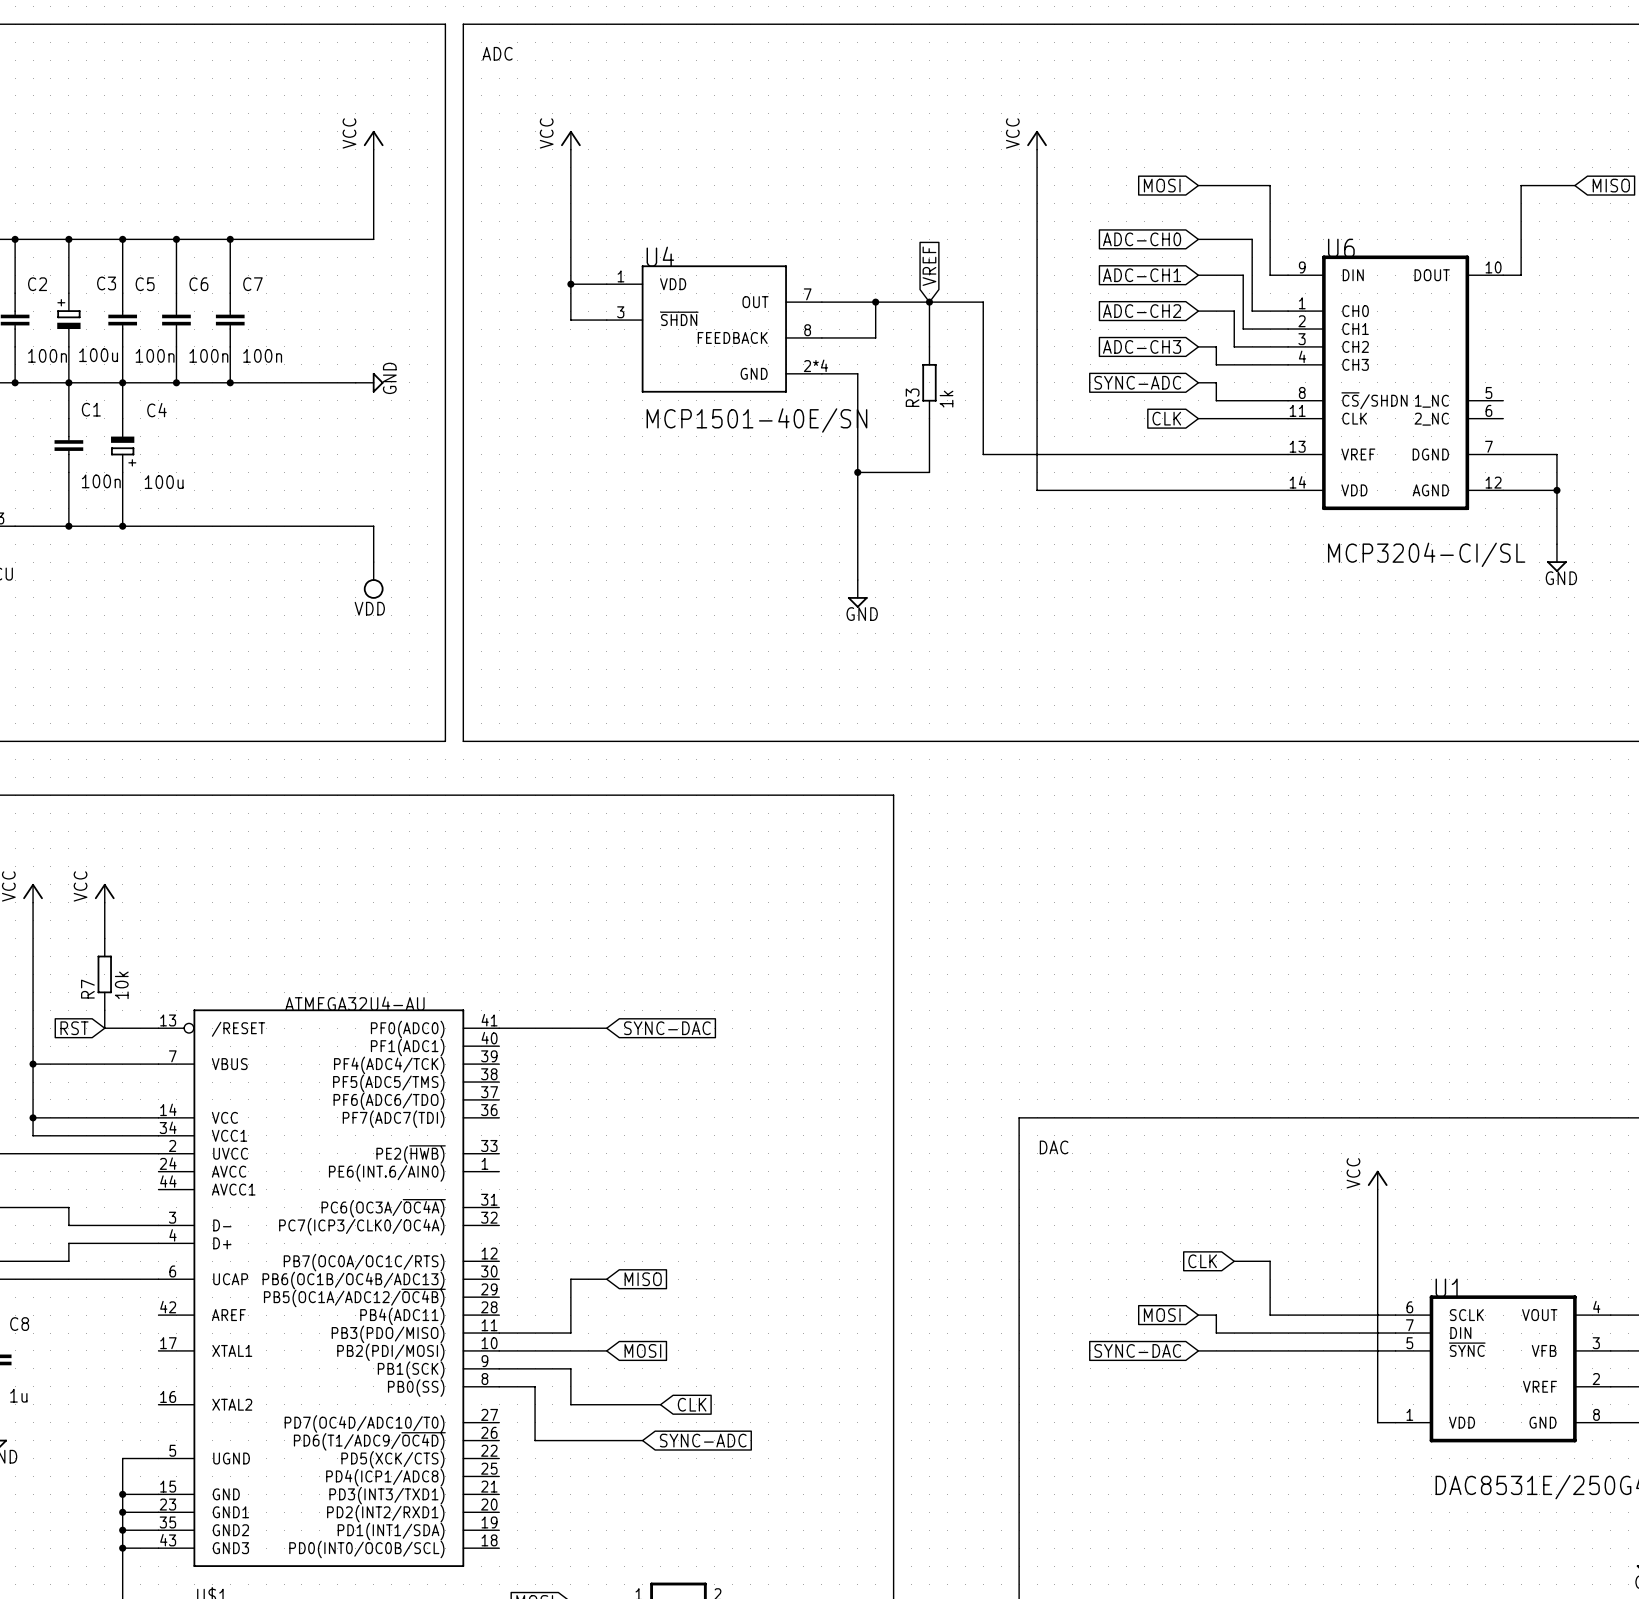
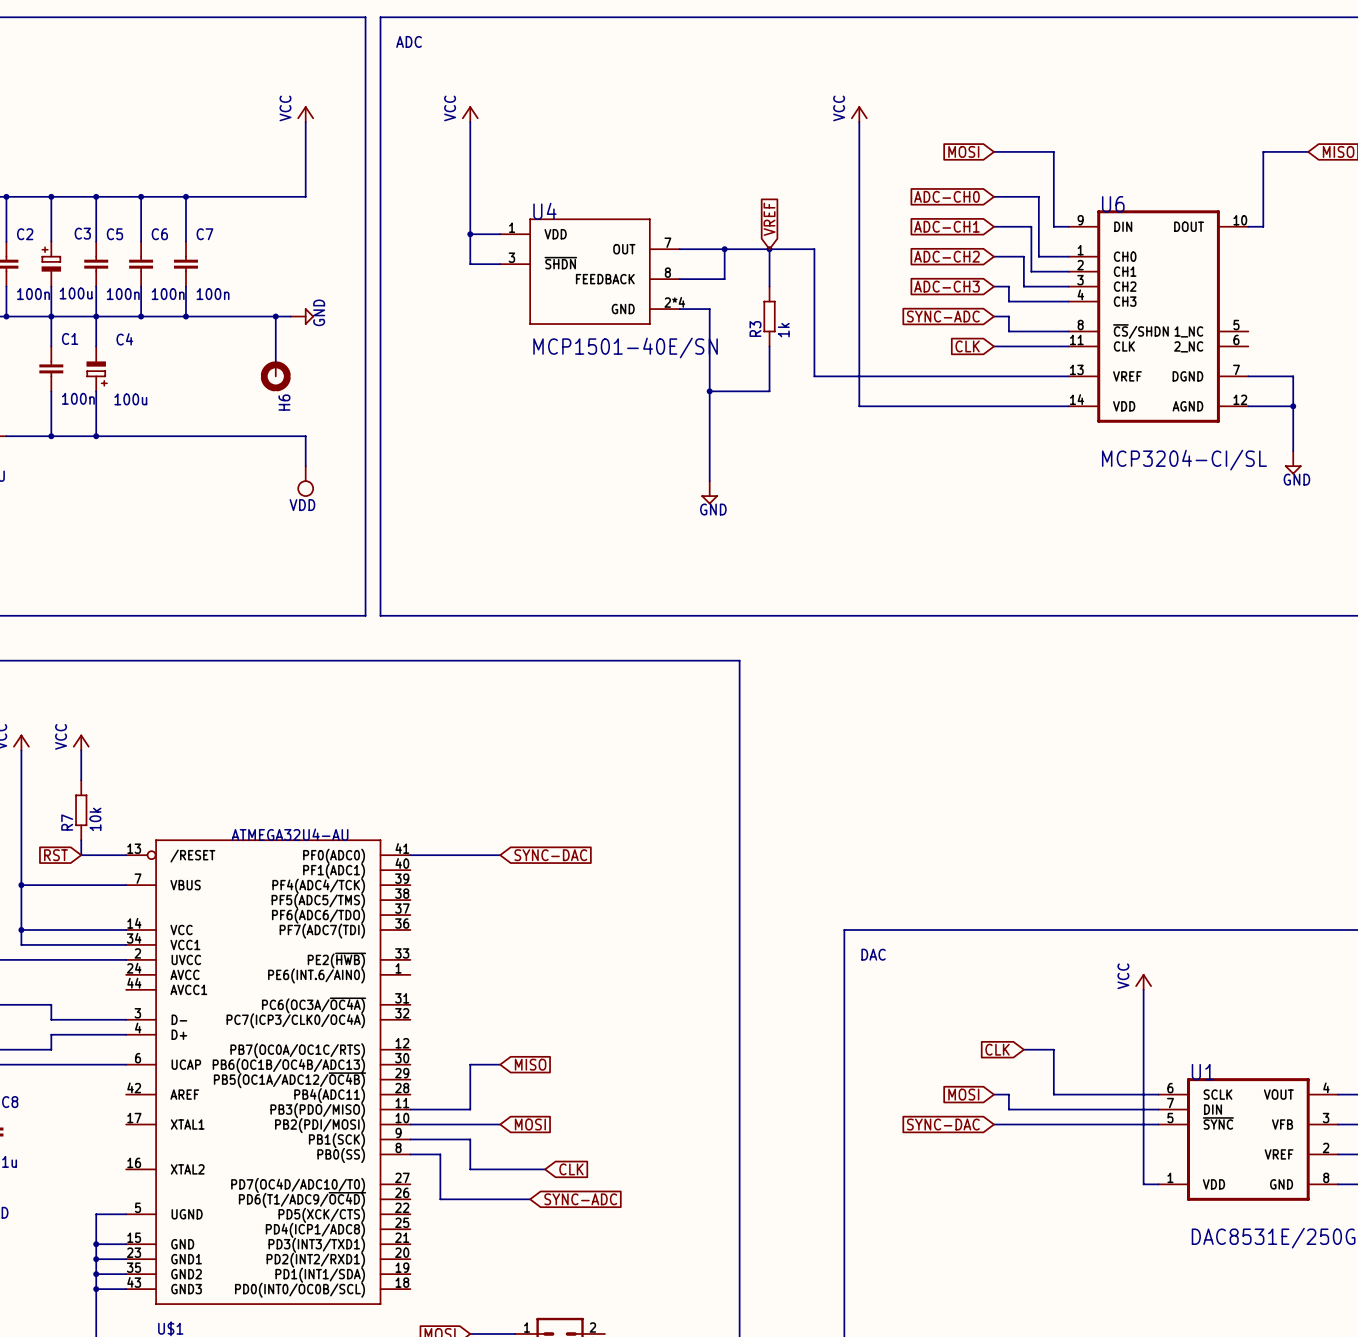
wire: none -> (275, 316) (275, 361)
junction: none -> (275, 316)
H6: none -> (275, 376)

